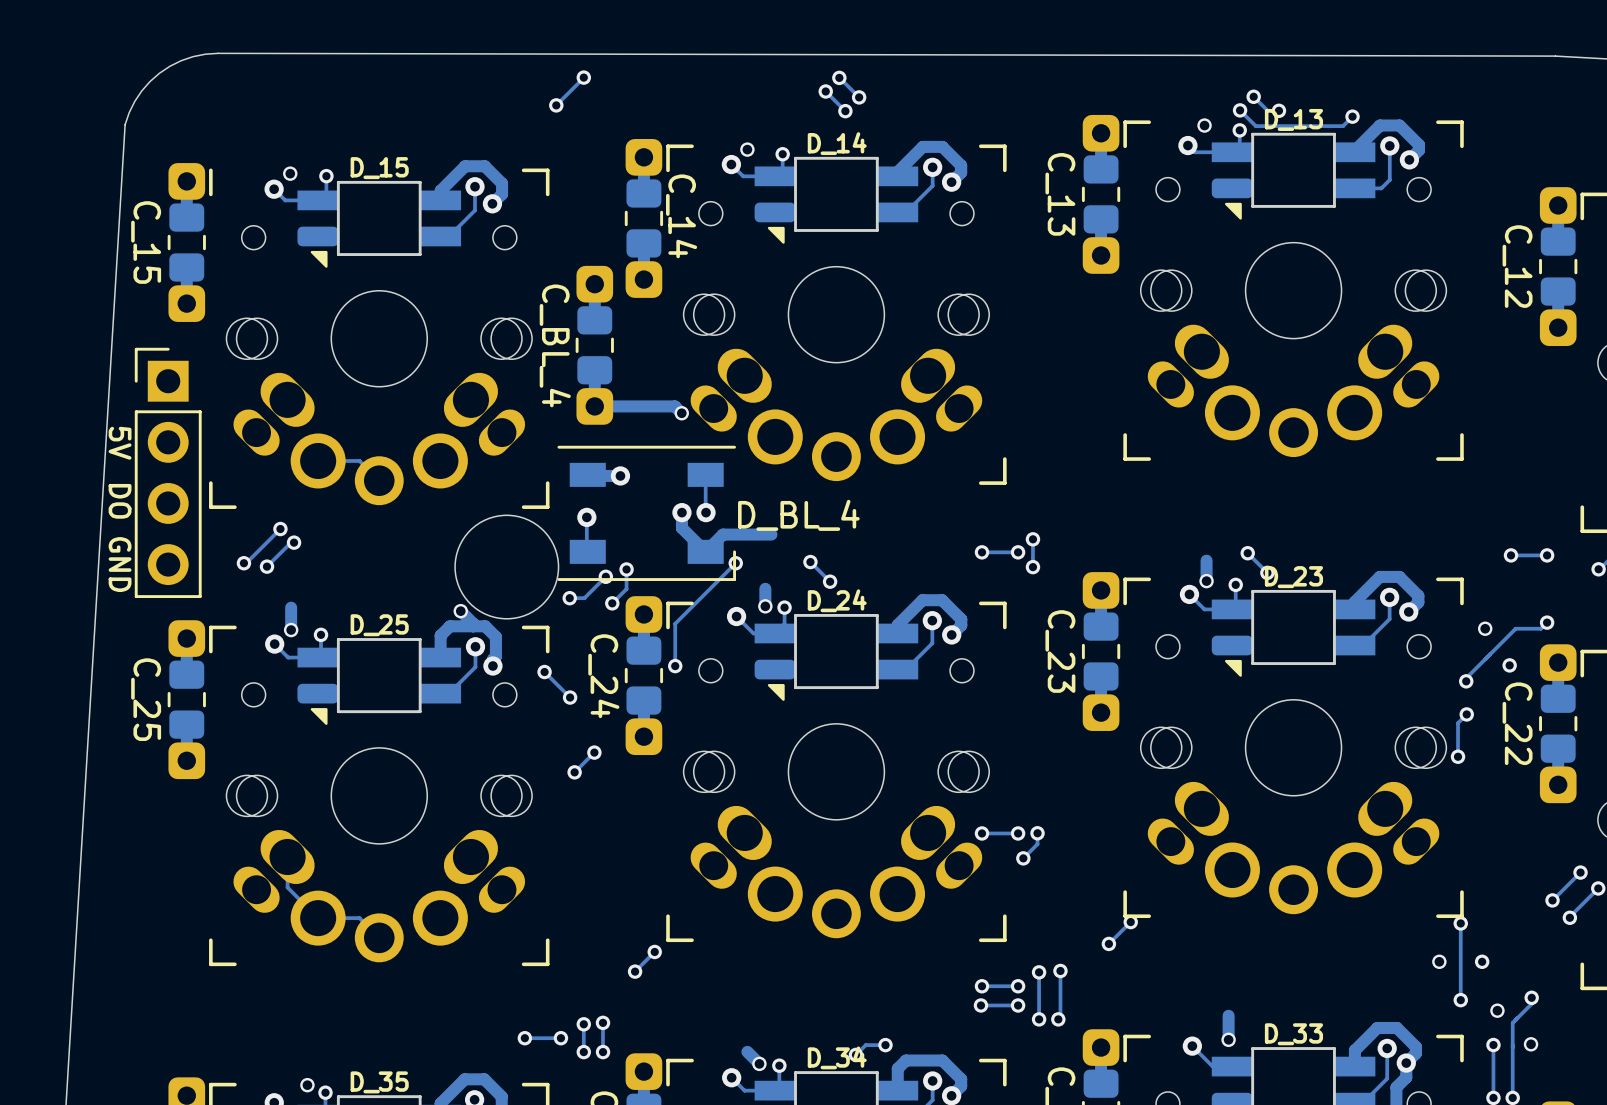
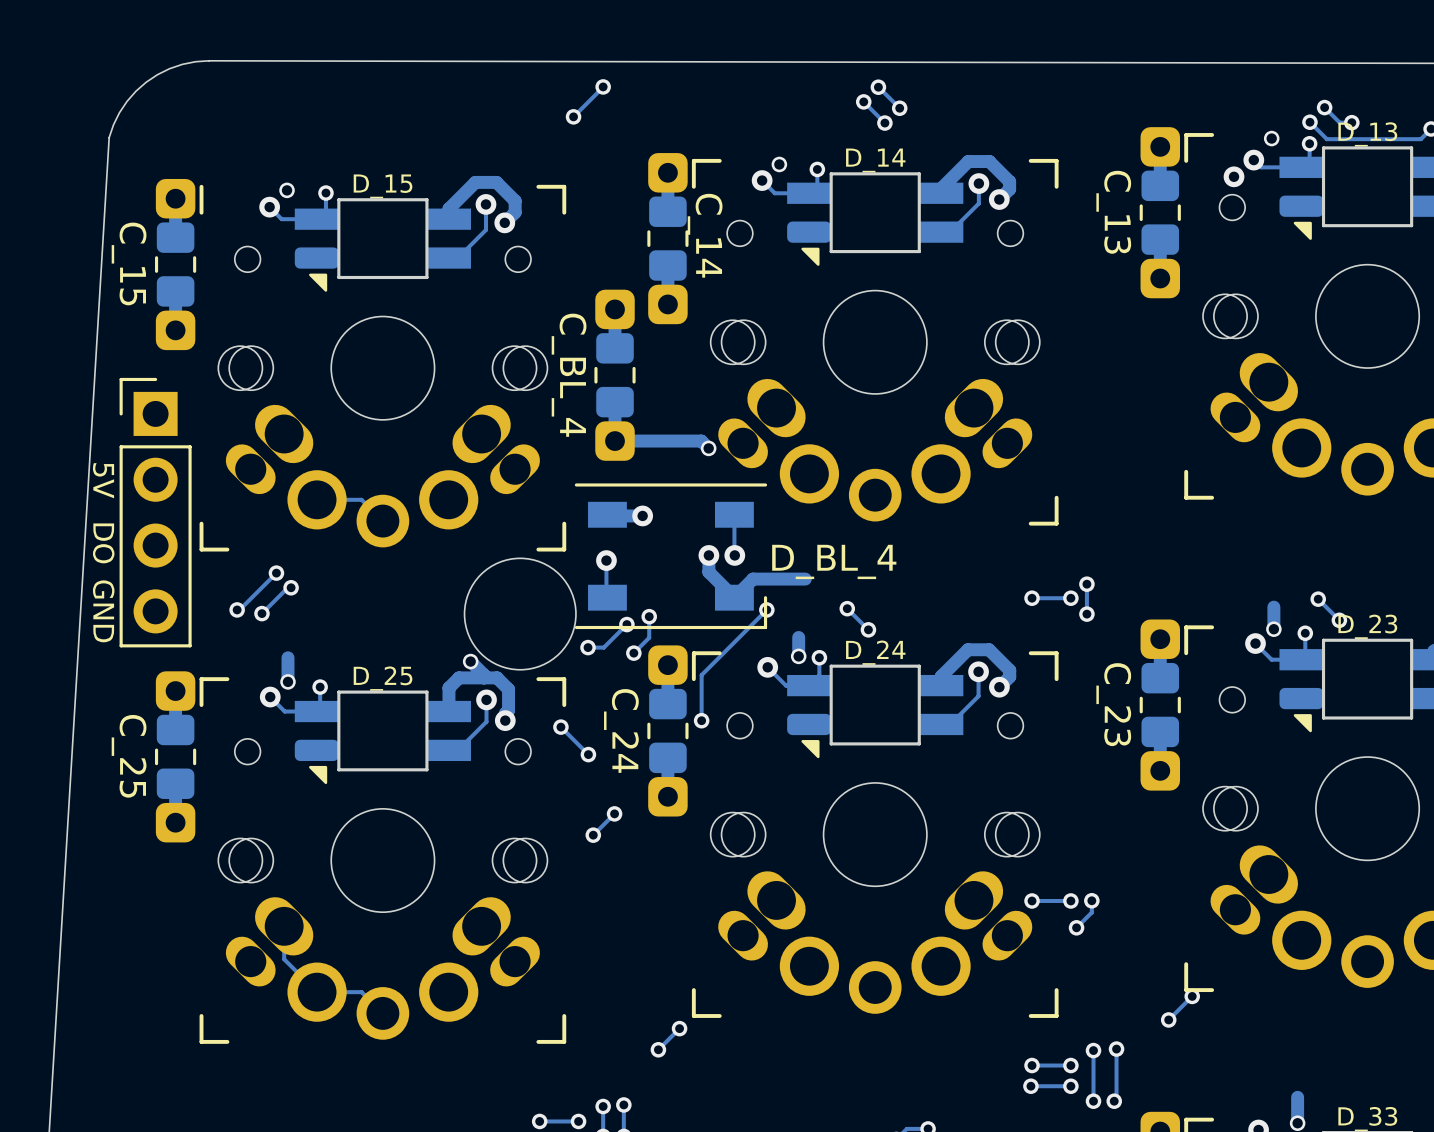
via: none -> (1234, 176)

